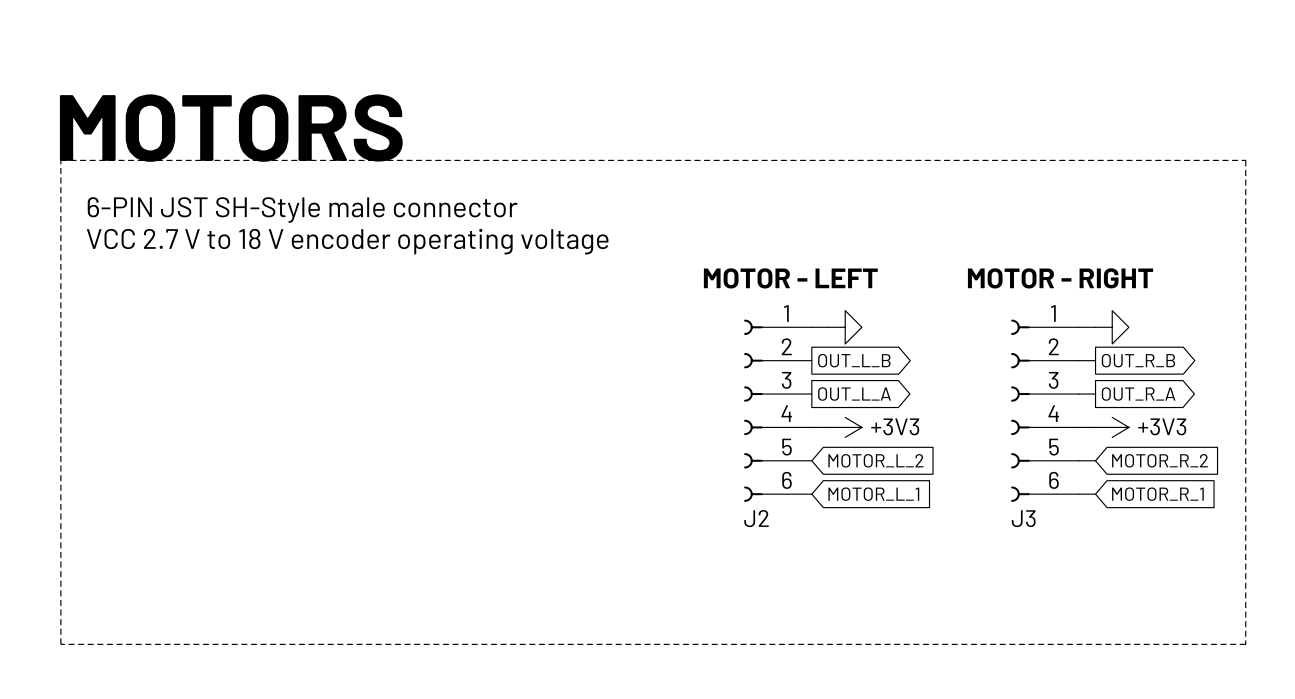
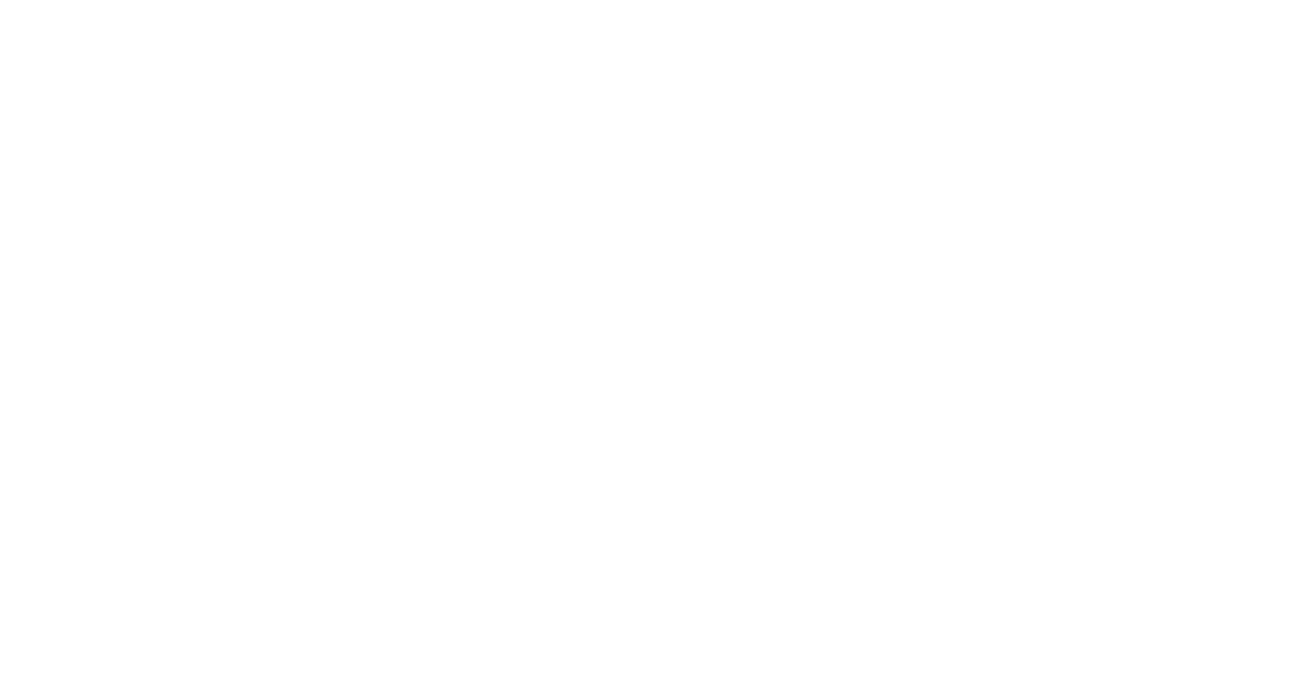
text: MOTORS (231, 128) -> none
line: (60, 160) (1245, 160) (1245, 644) (60, 644) (60, 160) -> none
text: 6-PIN JST SH-Style male connector (302, 209) -> none
text: VCC 2.7 V to 18 V encoder operating voltage (347, 241) -> none
text: MOTOR - LEFT (790, 278) -> none
text: MOTOR - RIGHT (1060, 278) -> none
wire: (811, 327) (828, 327) -> none
power symbol: (845, 327) -> none
wire: (1078, 327) (1095, 327) -> none
power symbol: (1112, 327) -> none
global label: OUT_L_B (854, 360) -> none
wire: (1078, 360) (1095, 360) -> none
global label: OUT_R_B (1138, 360) -> none
global label: OUT_L_A (854, 394) -> none
wire: (1078, 394) (1095, 394) -> none
global label: OUT_R_A (1138, 394) -> none
J2: (777, 410) -> none
J3: (1044, 410) -> none
wire: (811, 427) (828, 427) -> none
power symbol: +3V3 (845, 427) -> none
wire: (1078, 427) (1095, 427) -> none
power symbol: +3V3 (1112, 427) -> none
global label: MOTOR_L_2 (875, 460) -> none
wire: (1078, 460) (1095, 460) -> none
global label: MOTOR_R_2 (1159, 460) -> none
global label: MOTOR_L_1 (873, 494) -> none
wire: (1078, 494) (1095, 494) -> none
global label: MOTOR_R_1 (1157, 494) -> none

